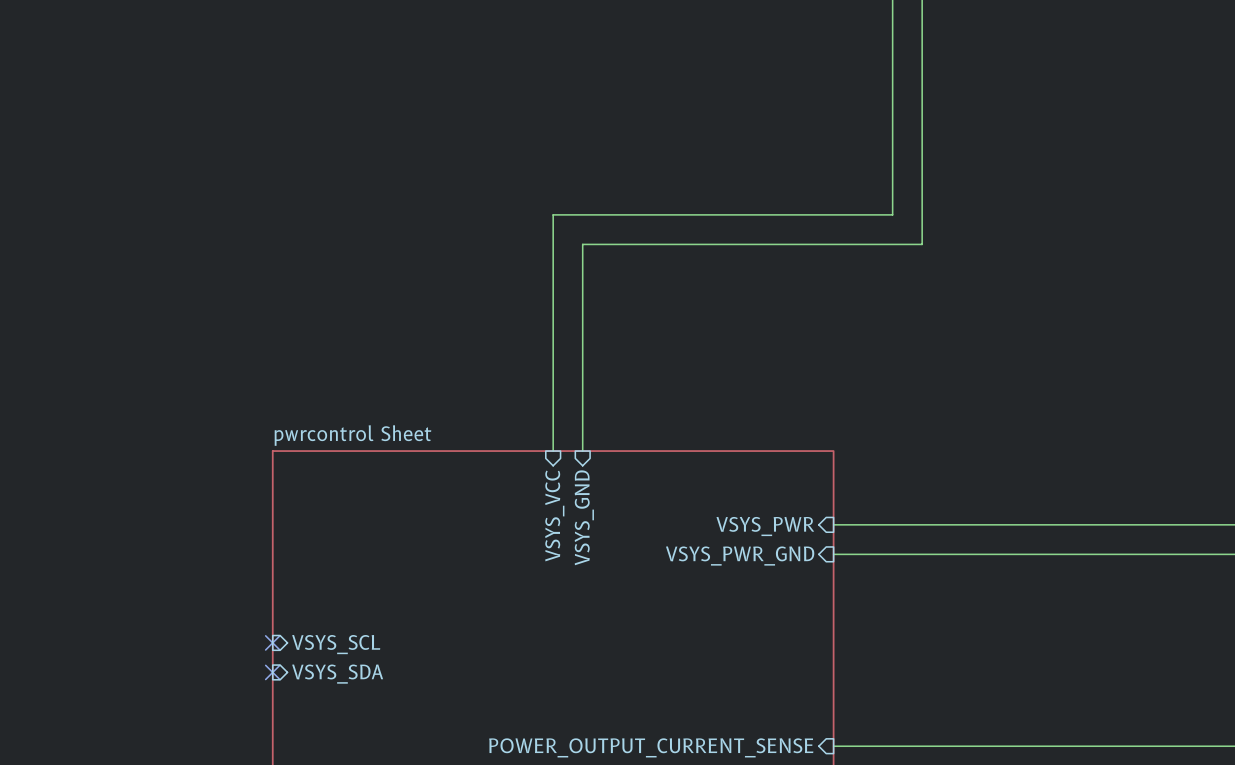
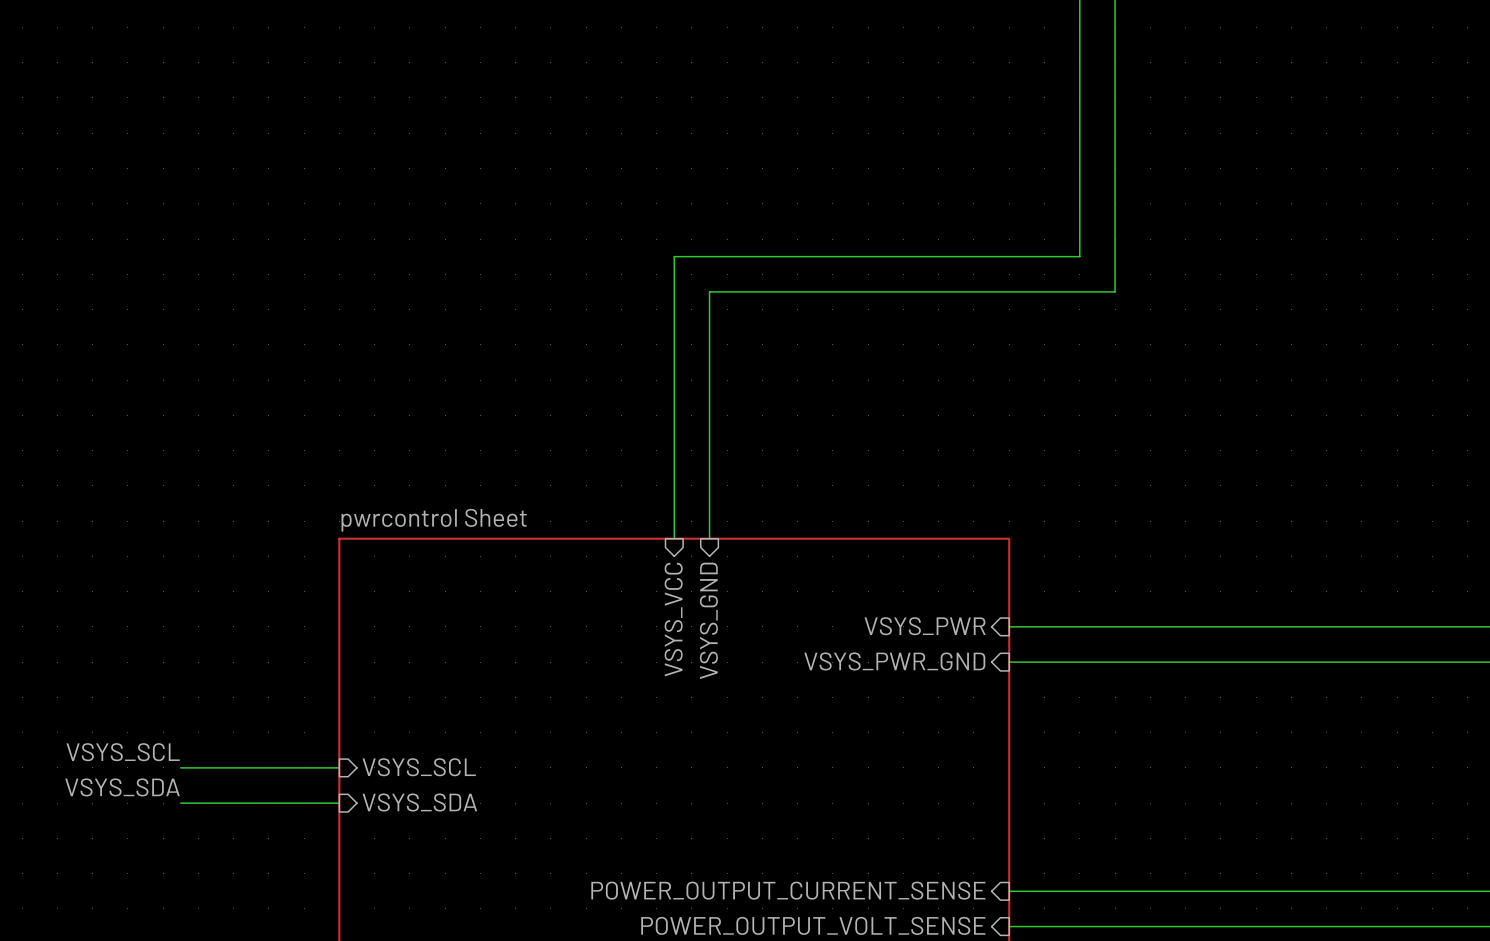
label: none -> VSYS_SCL (123, 752)
wire: none -> (180, 767) (339, 767)
no-connect mark: (272, 642) -> none
label: none -> VSYS_SDA (122, 787)
wire: none -> (180, 803) (339, 803)
no-connect mark: (272, 672) -> none

